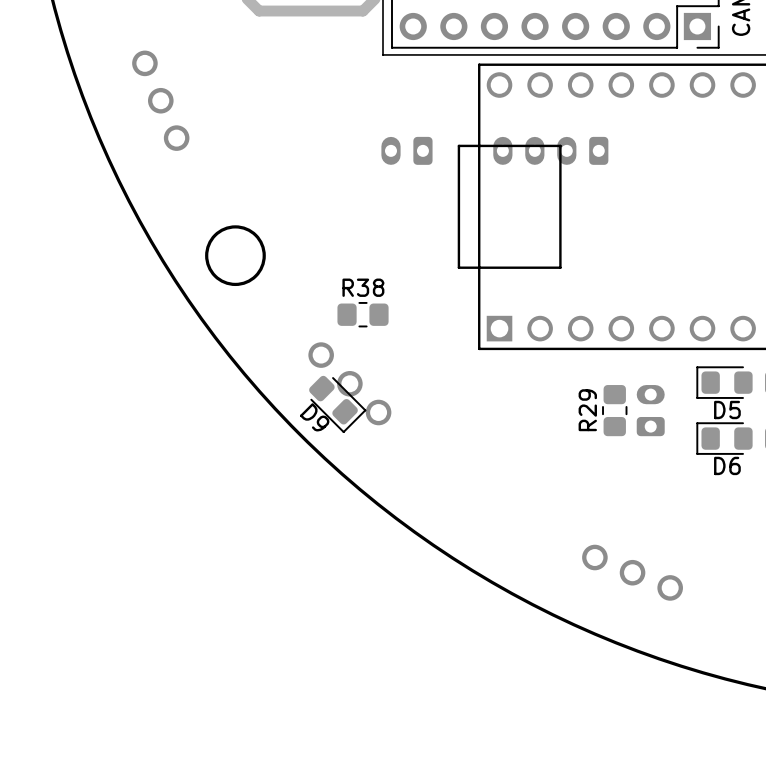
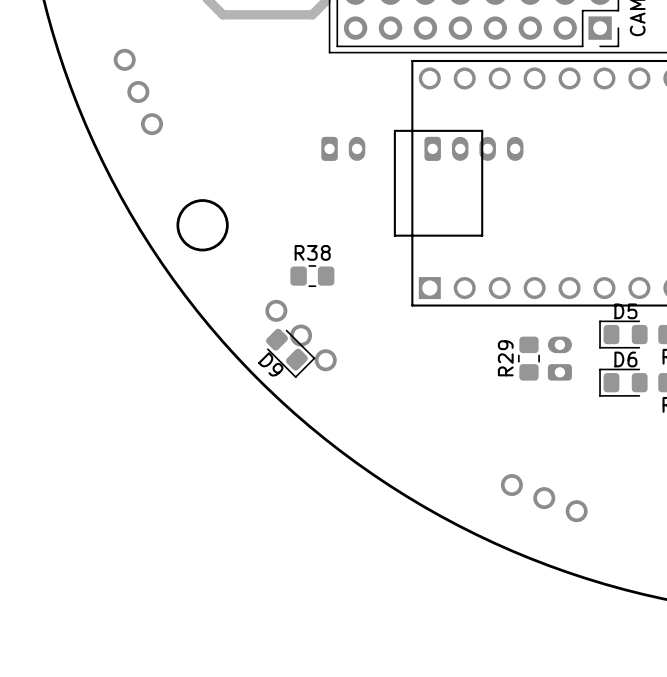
part rotation: 0° (406, 150) -> 180° (343, 148)
part rotation: 0° (550, 150) -> 180° (473, 148)
D5 name position: D5 (727, 410) -> D5 (625, 311)
D6 name position: D6 (727, 465) -> D6 (625, 359)

